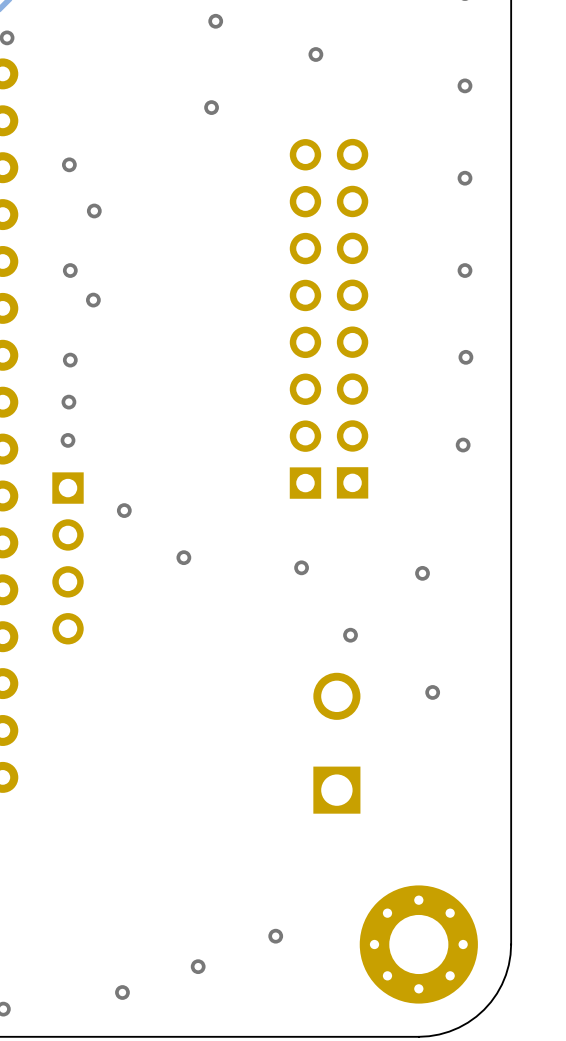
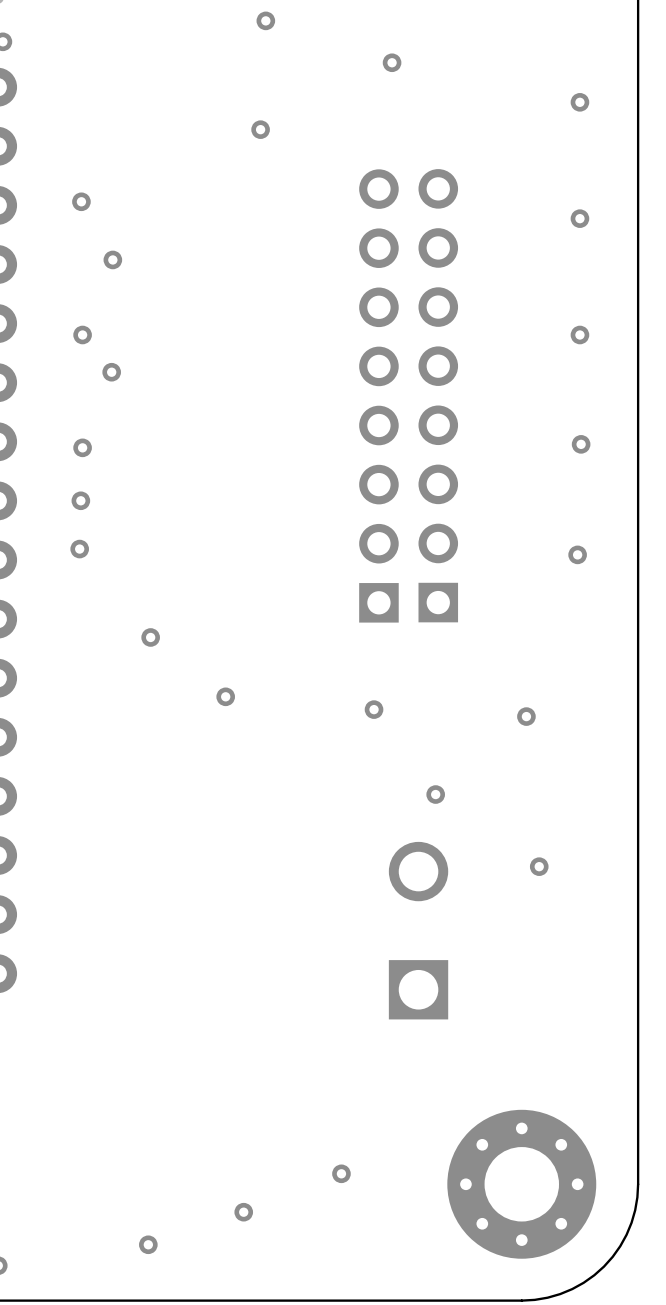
part: (68, 558) -> none

